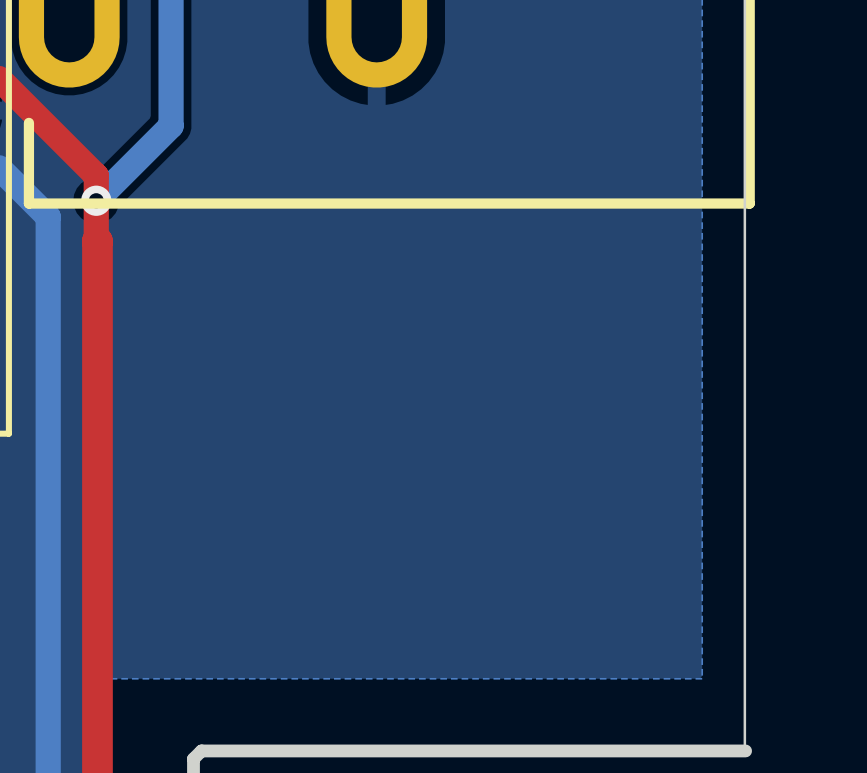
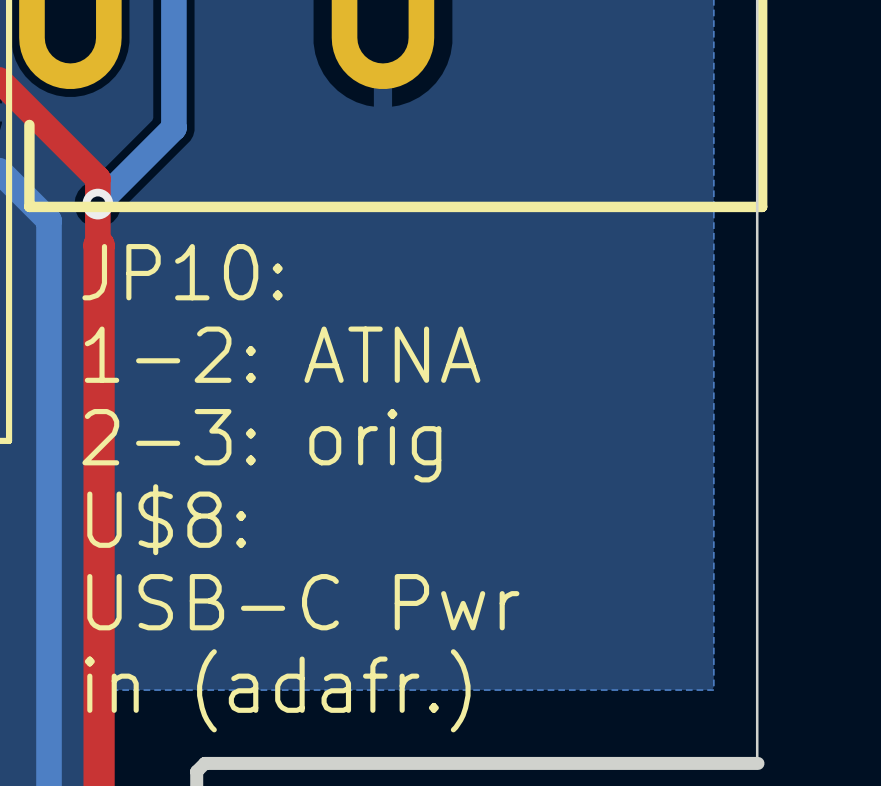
text: none -> JP10: (182, 272)
text: none -> 1-2: ATNA (282, 354)
text: none -> 2-3: orig (261, 445)
text: none -> U$8: (166, 519)
text: none -> USB-C Pwr (303, 602)
text: none -> in (adafr.) (277, 690)

